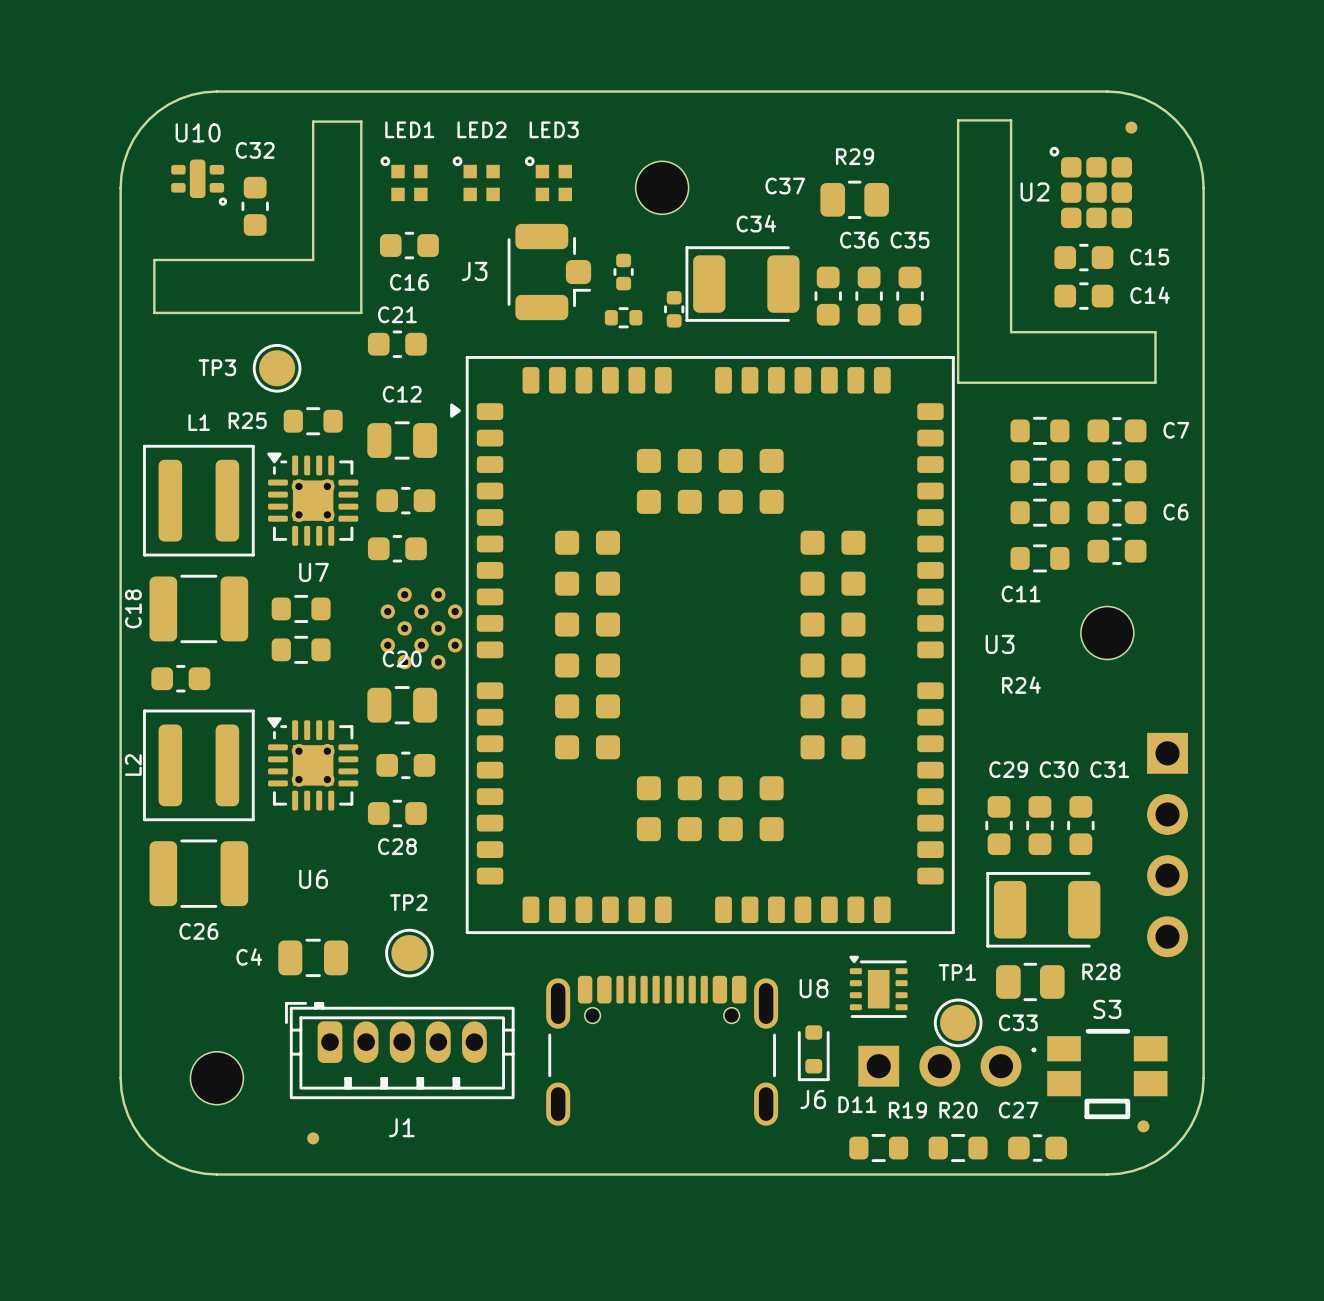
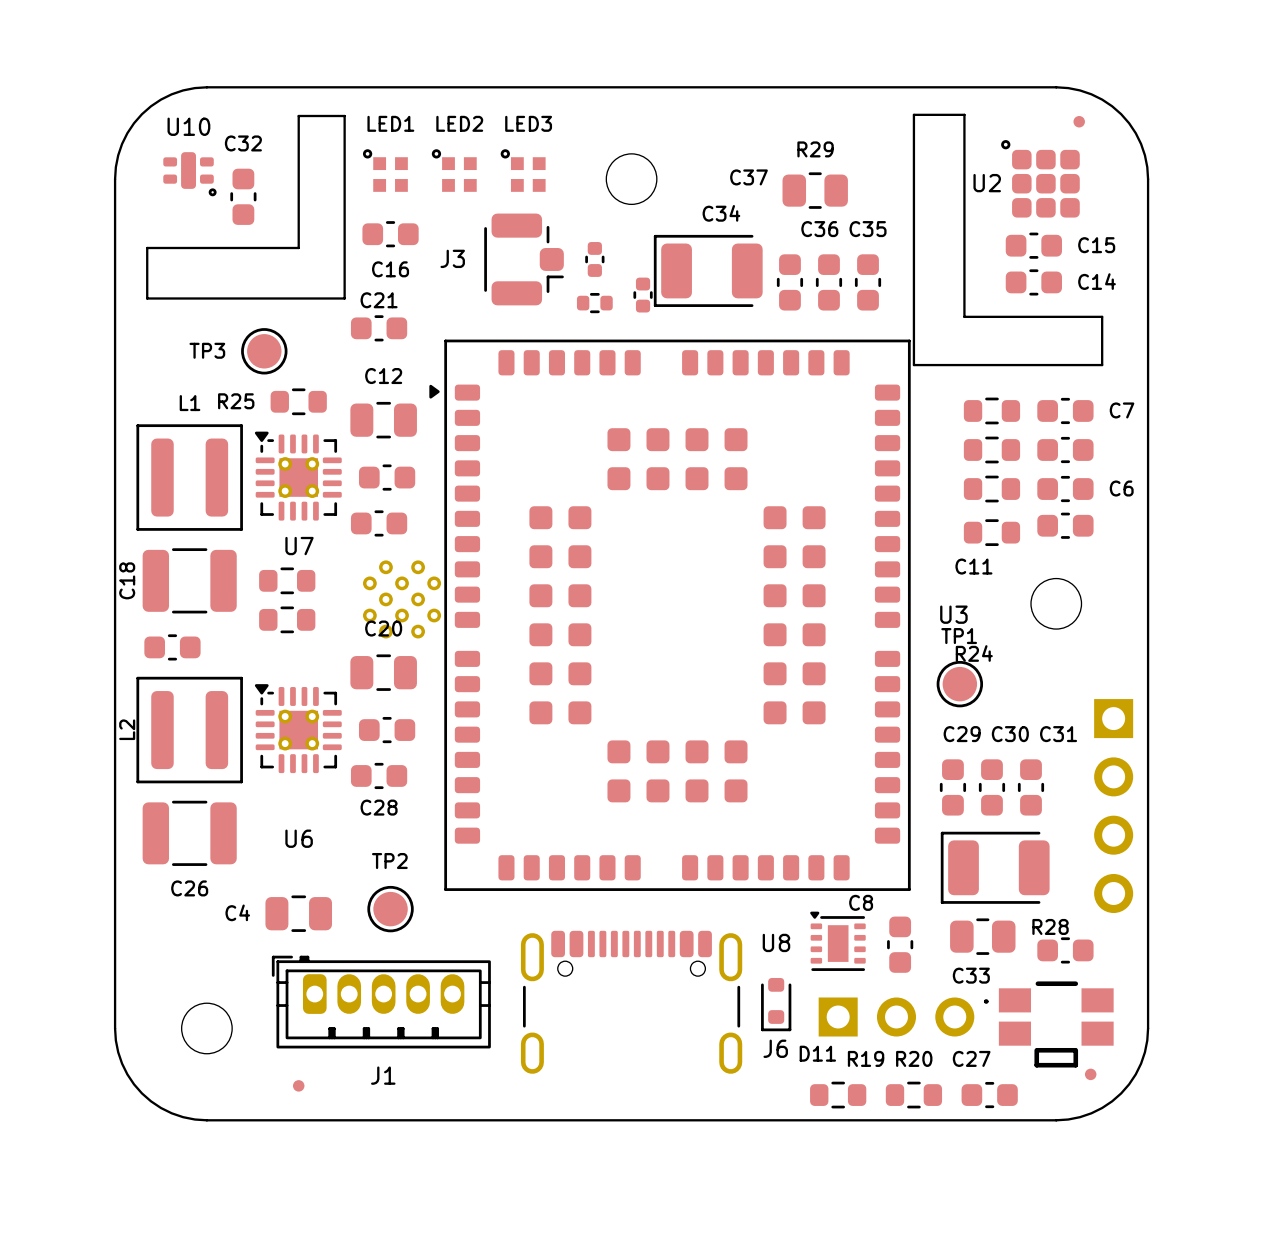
C8: none -> (900, 944)
part: none -> (1065, 950)
S3 name: S3 (1107, 1009) -> none
TP1 position: (958, 1022) -> (959, 684)

